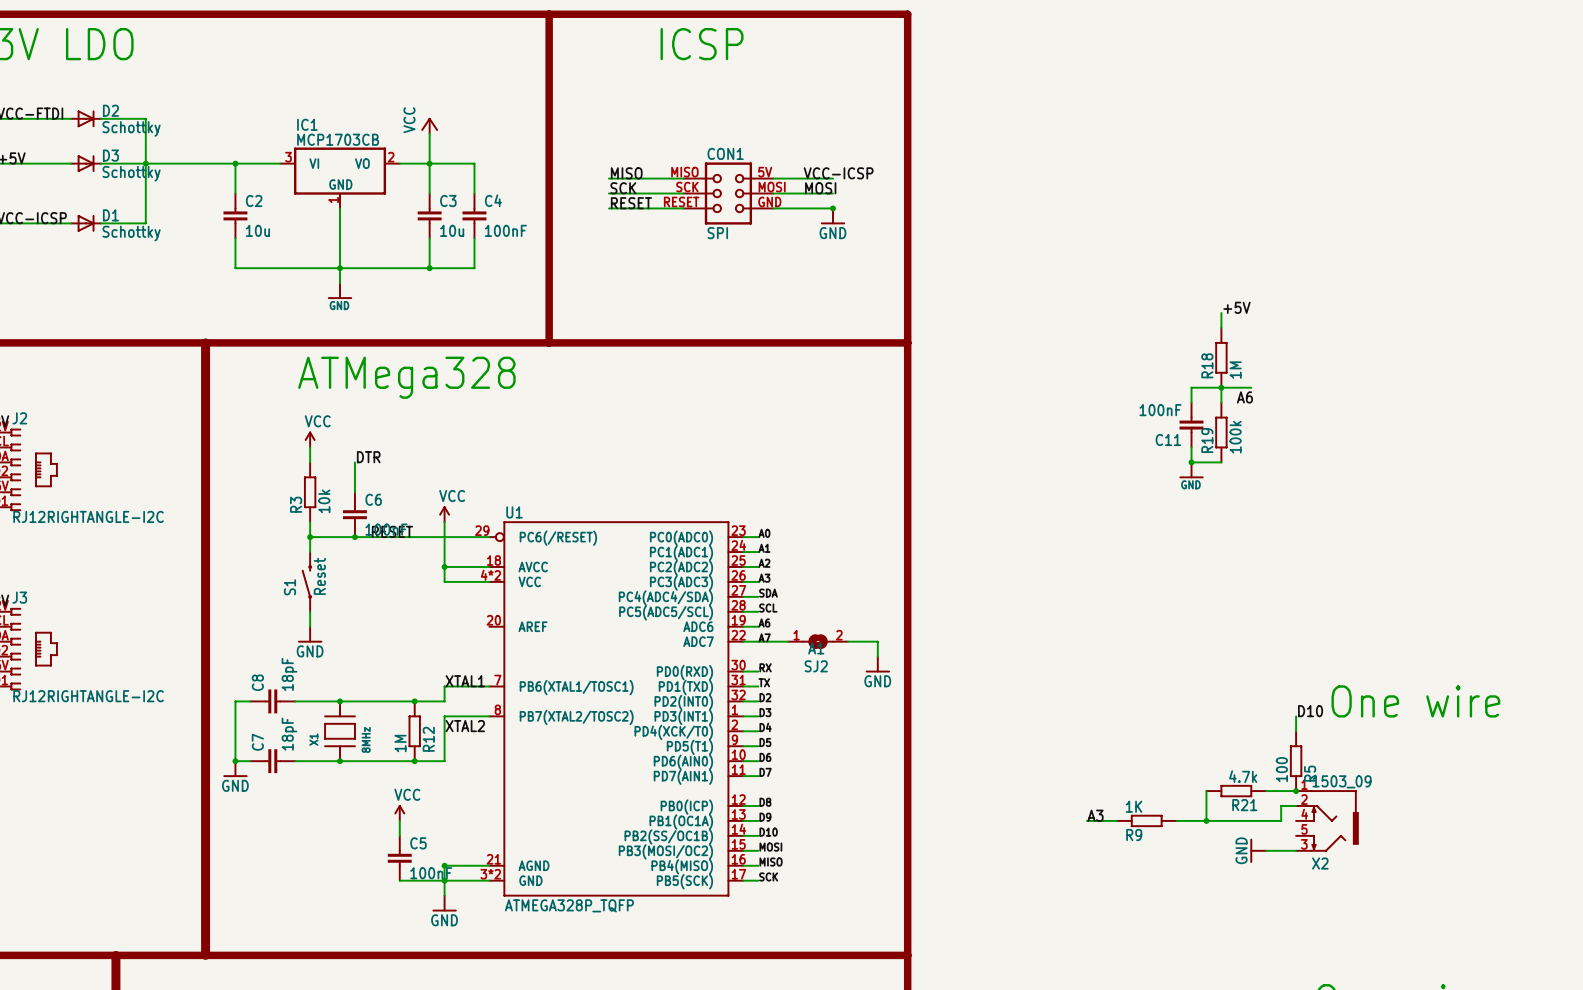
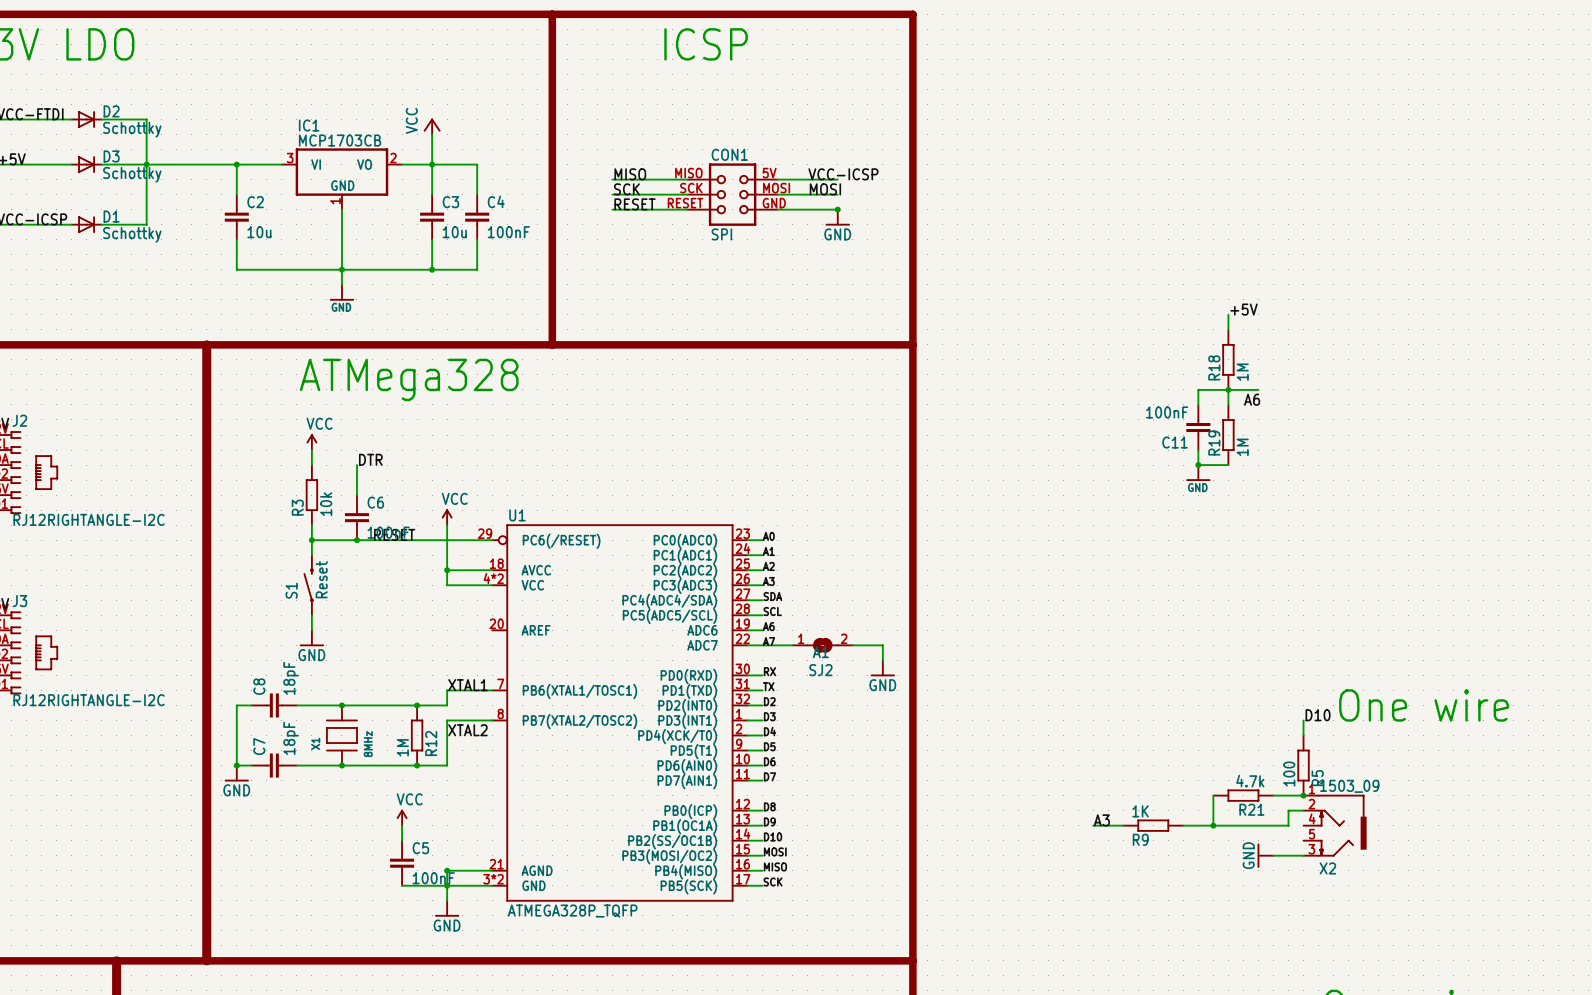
R19 value: 100k (1235, 437) -> 1M (1242, 447)

